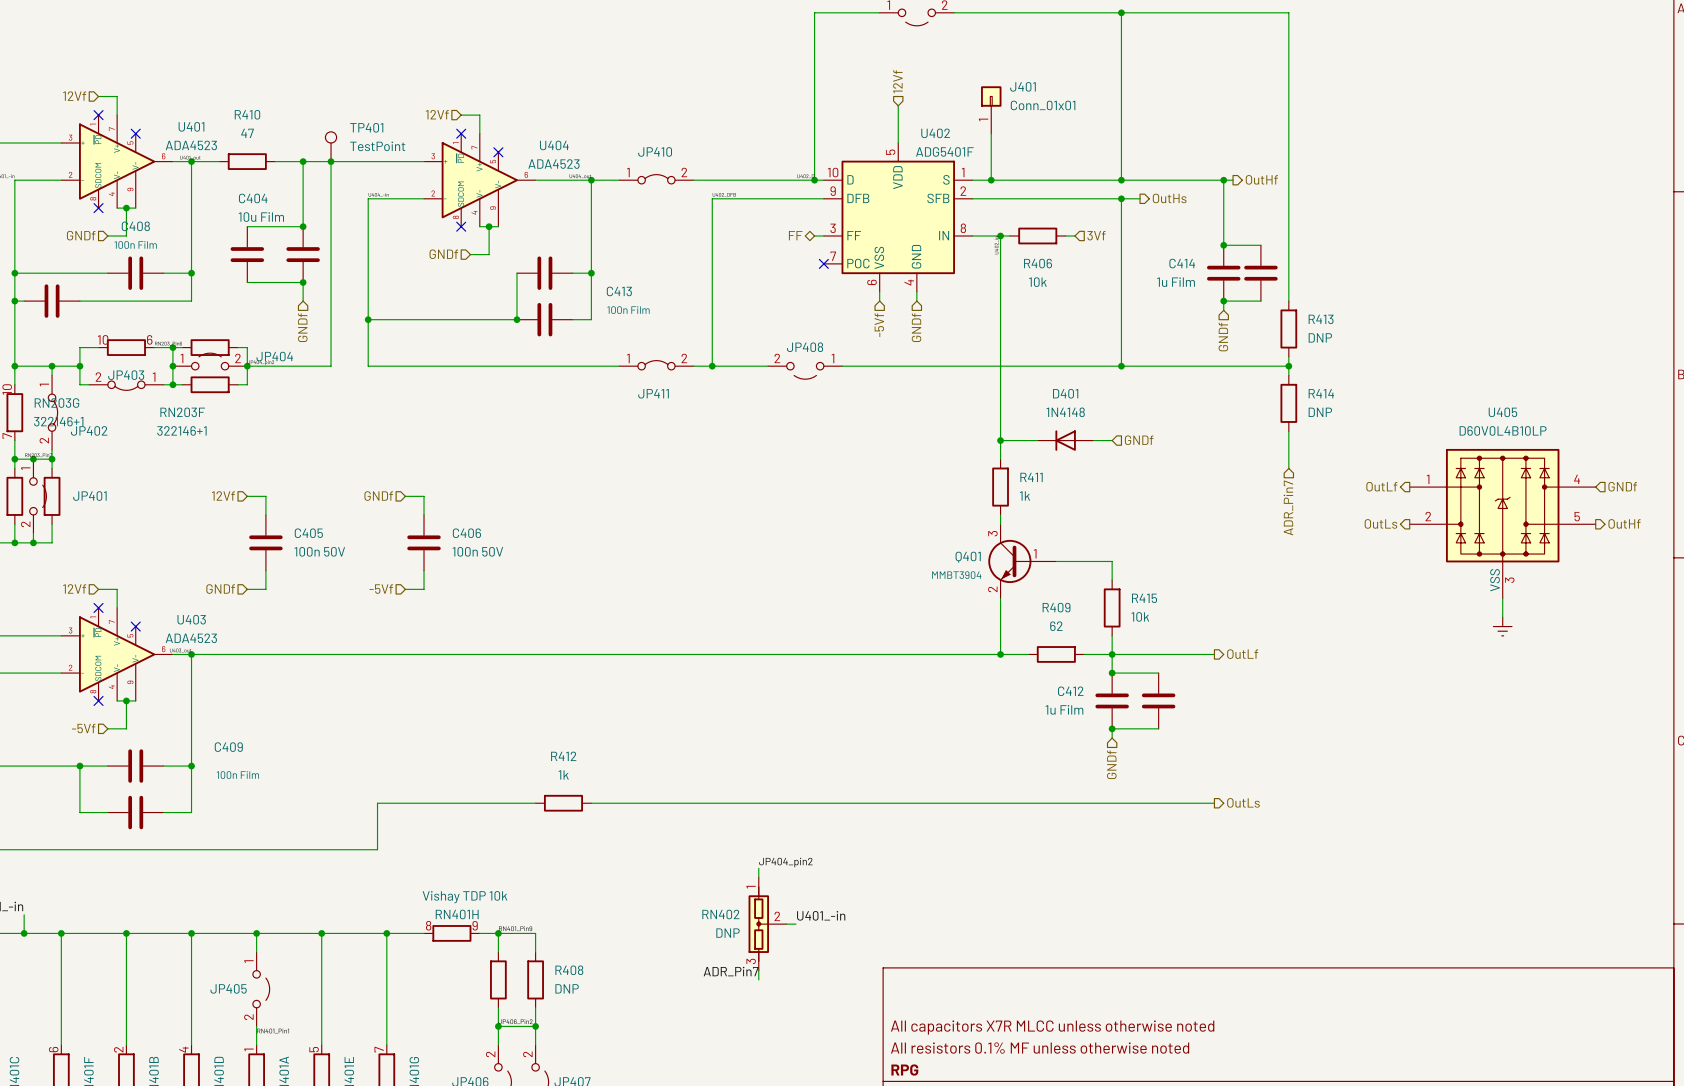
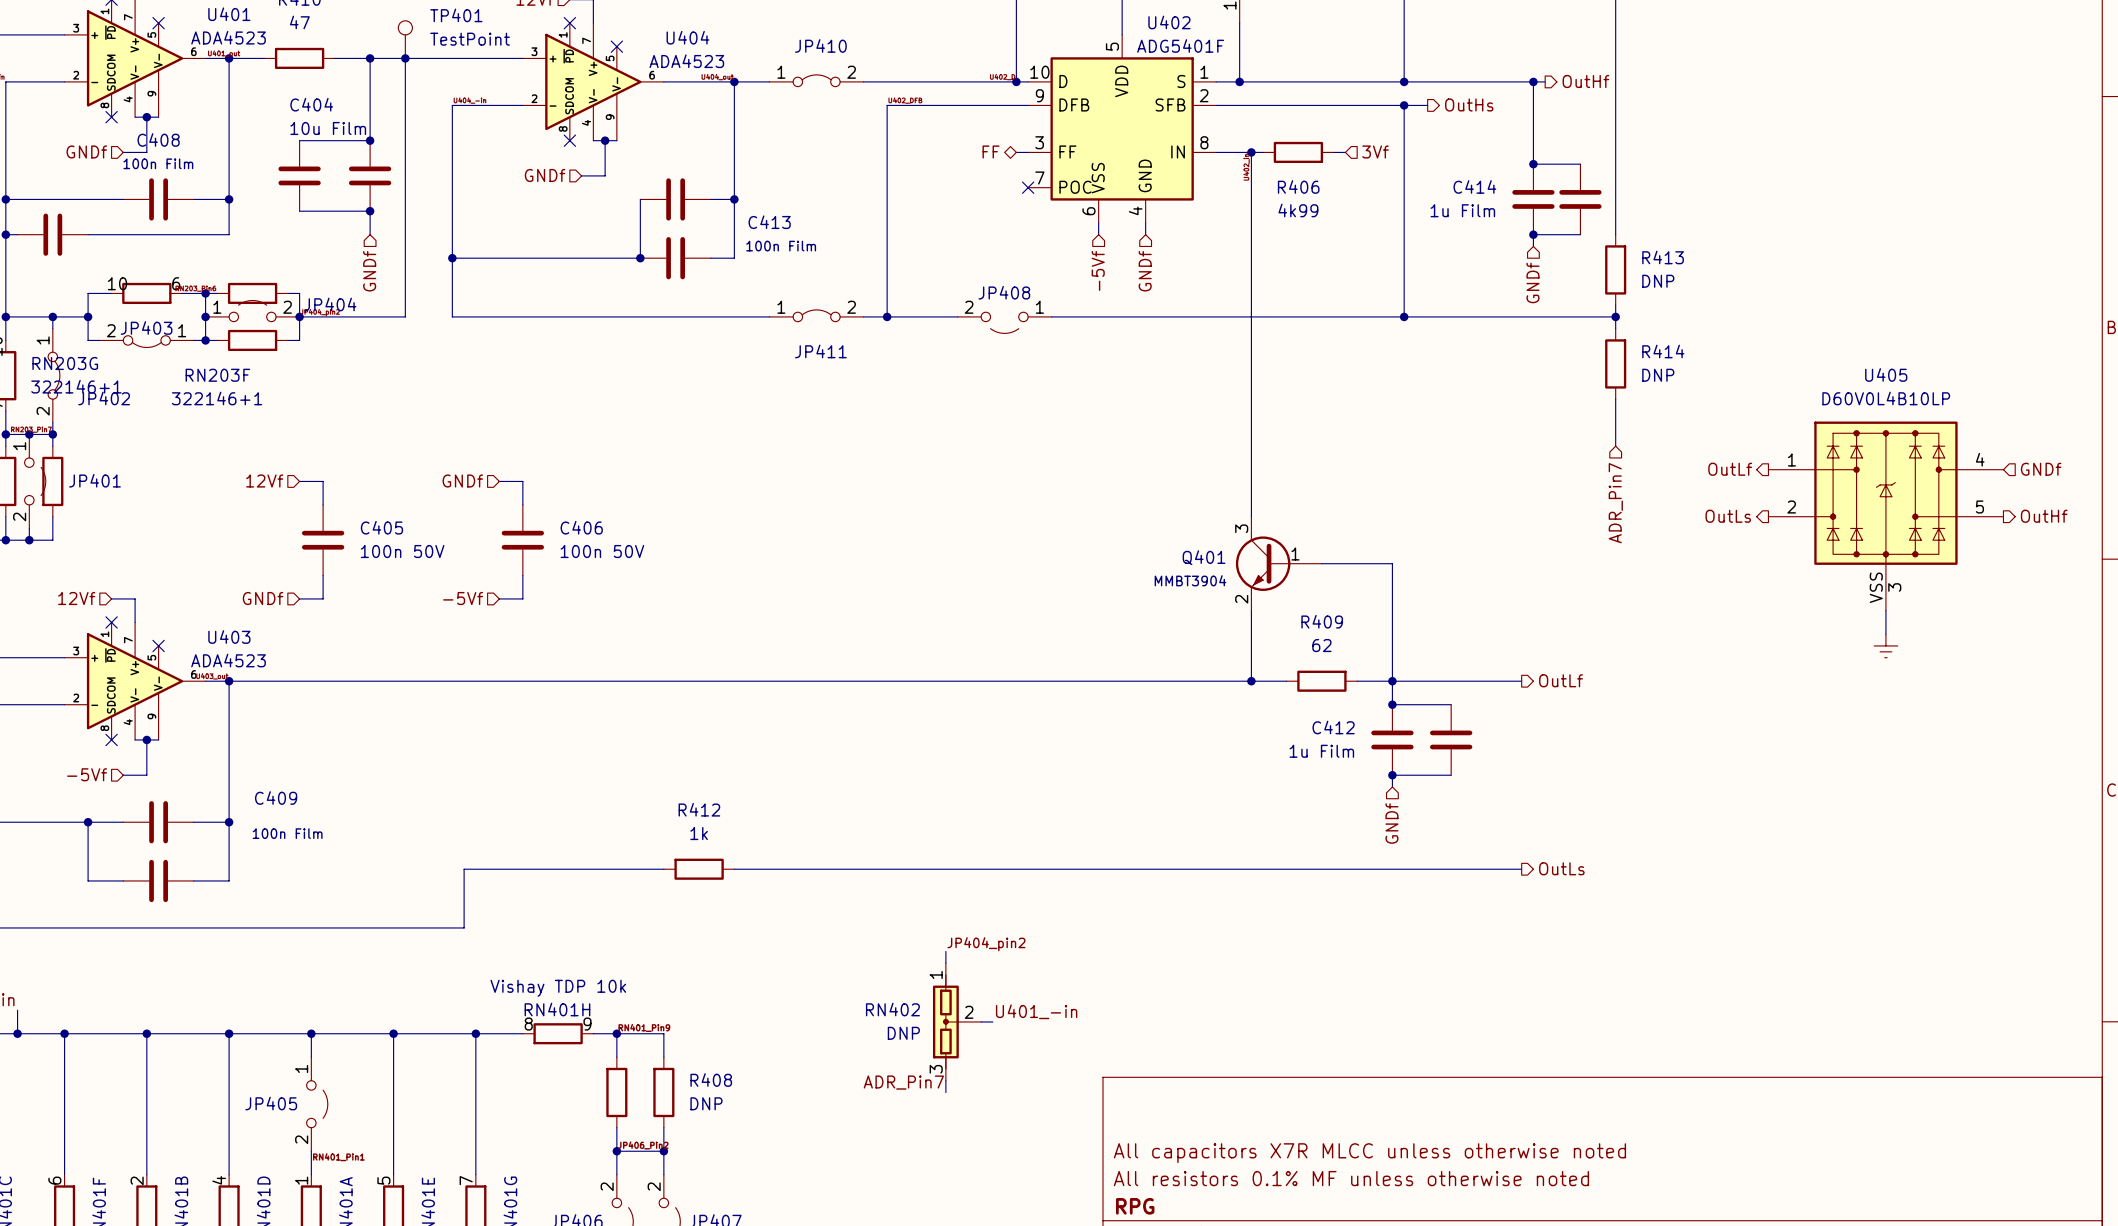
R406 value: 10k (1037, 282) -> 4k99 (1298, 210)
wire: (1000, 440) (1037, 440) -> none
junction: (1000, 440) -> none
D401: 1N4148 (1065, 440) -> none
wire: (1093, 440) (1112, 440) -> none
hierarchical label: GNDf (1139, 440) -> none
wire: none -> (1251, 434) (1251, 504)
R411: 1k (1000, 487) -> none
wire: none -> (1392, 587) (1392, 657)
R415: 10k (1112, 607) -> none

